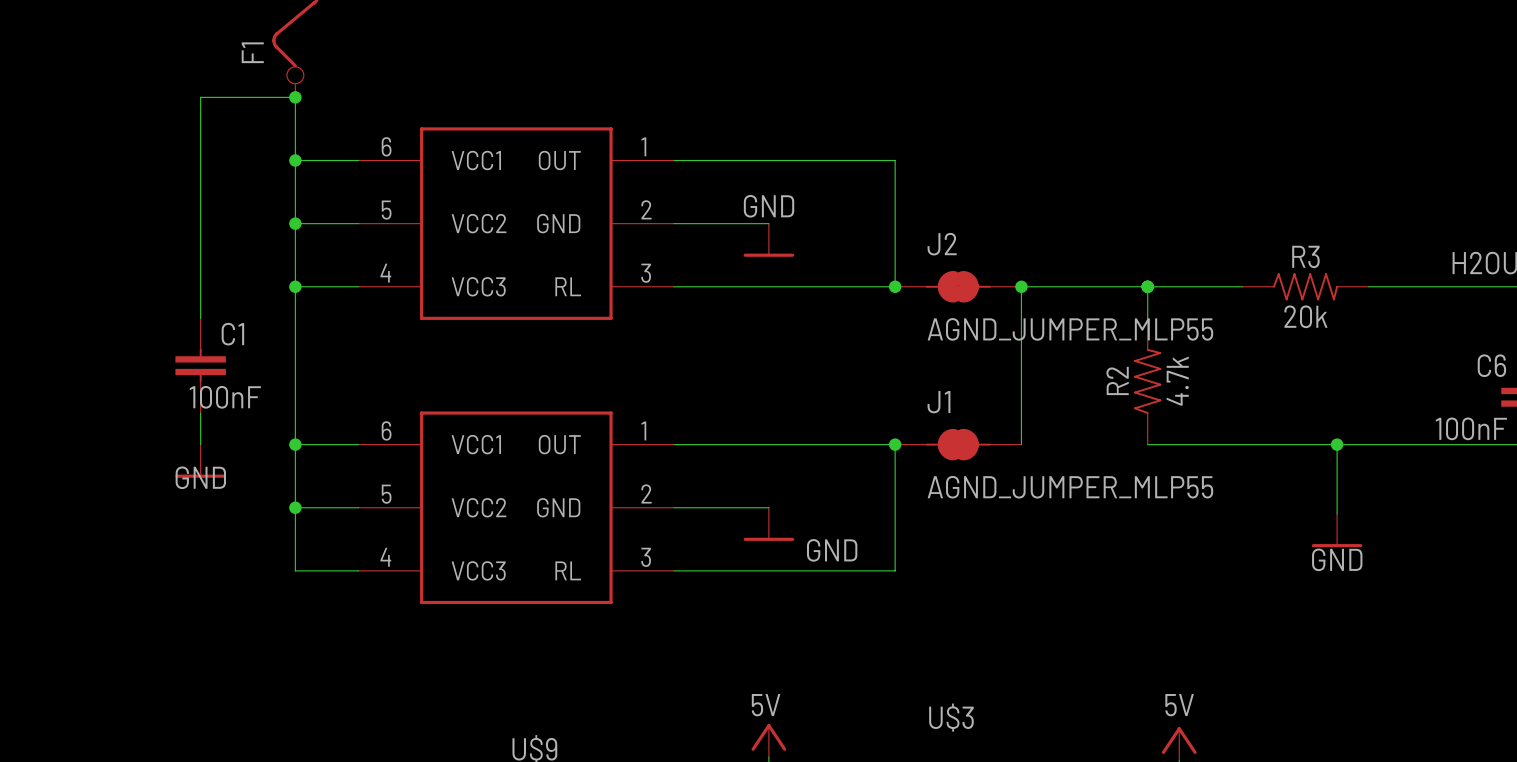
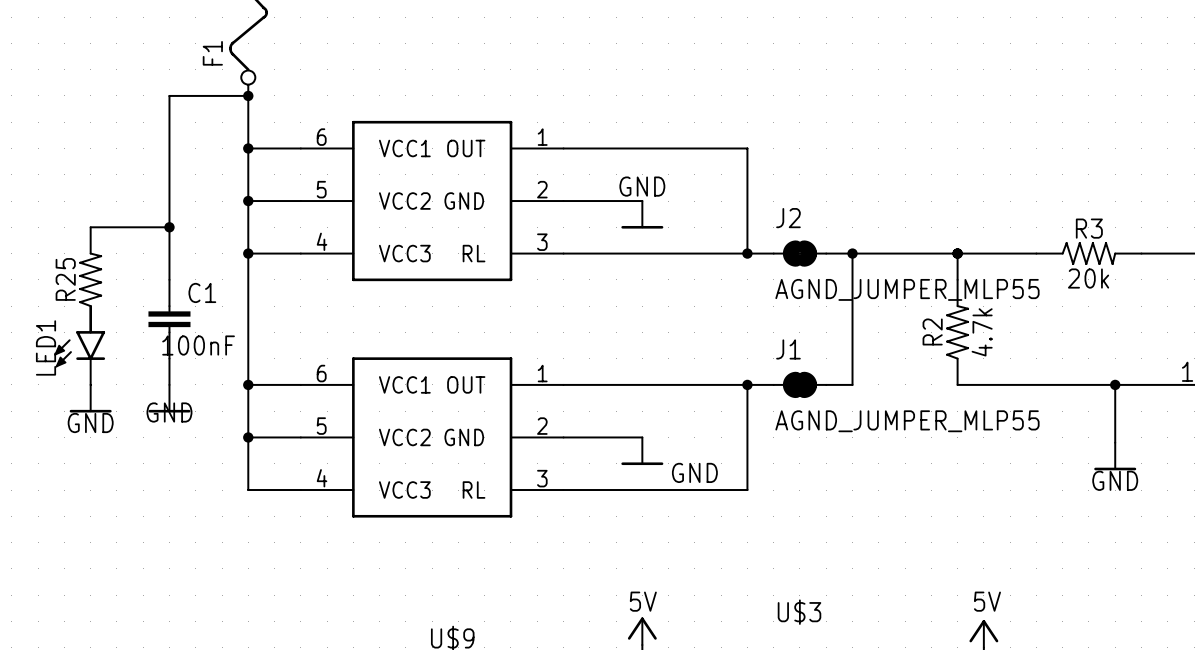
wire: none -> (90, 227) (169, 227)
junction: none -> (169, 227)
R25: none -> (90, 279)
LED1: none -> (79, 345)
power symbol: none -> GND (90, 398)

